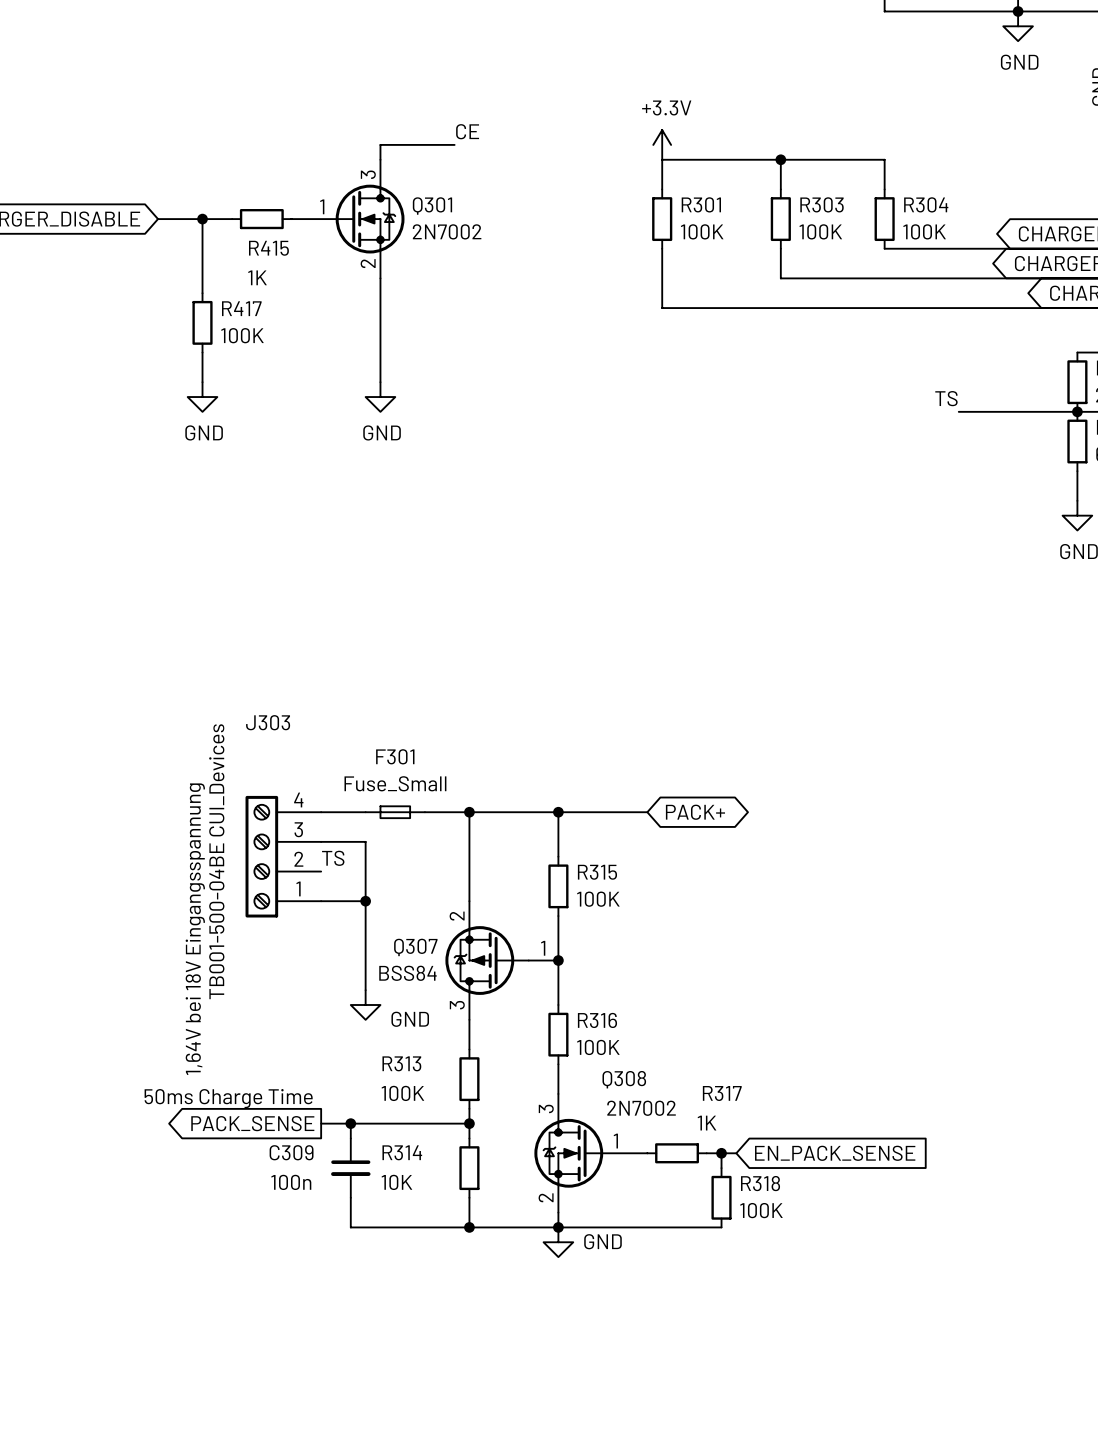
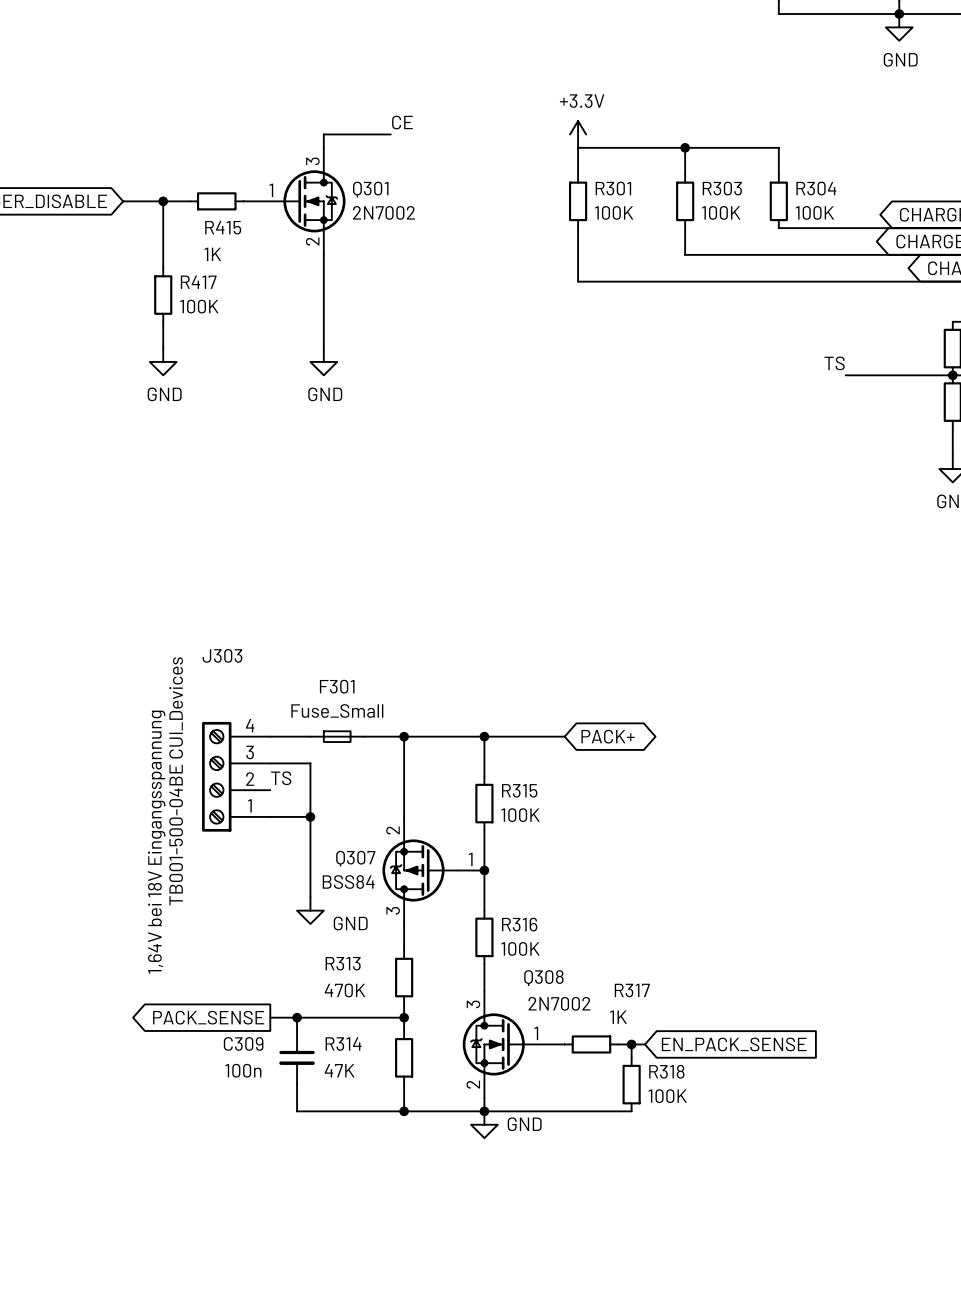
R313 value: 100K (402, 1093) -> 470K (345, 990)
text: 50ms Charge Time (228, 1098) -> none
R314 value: 10K (396, 1182) -> 47K (339, 1070)

